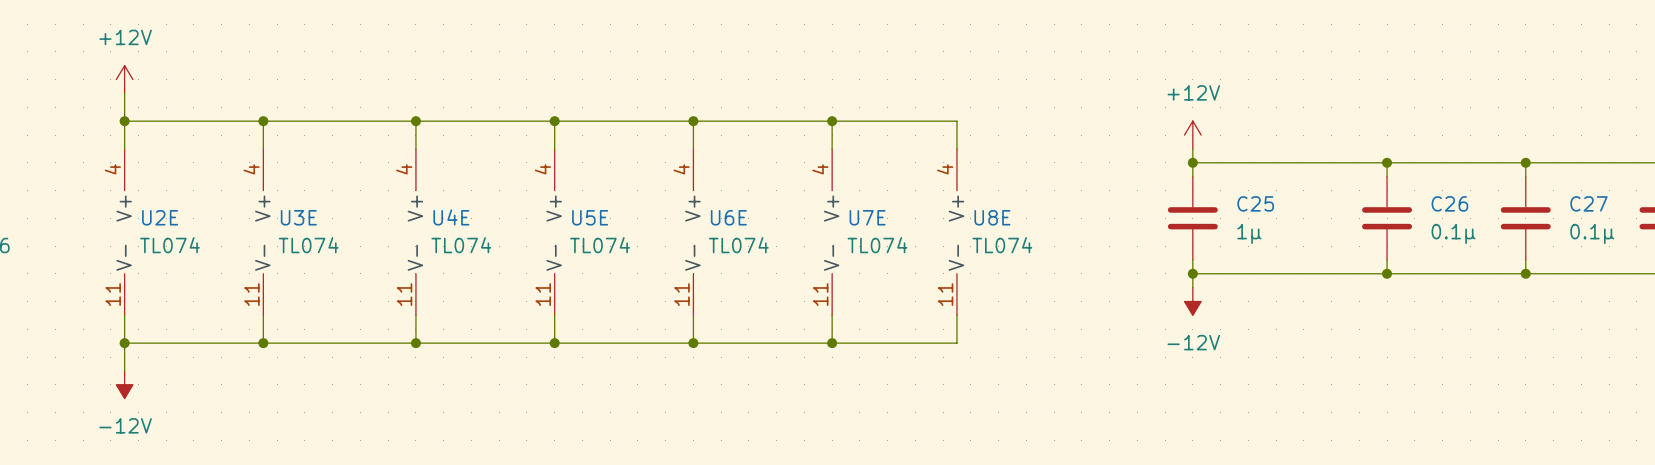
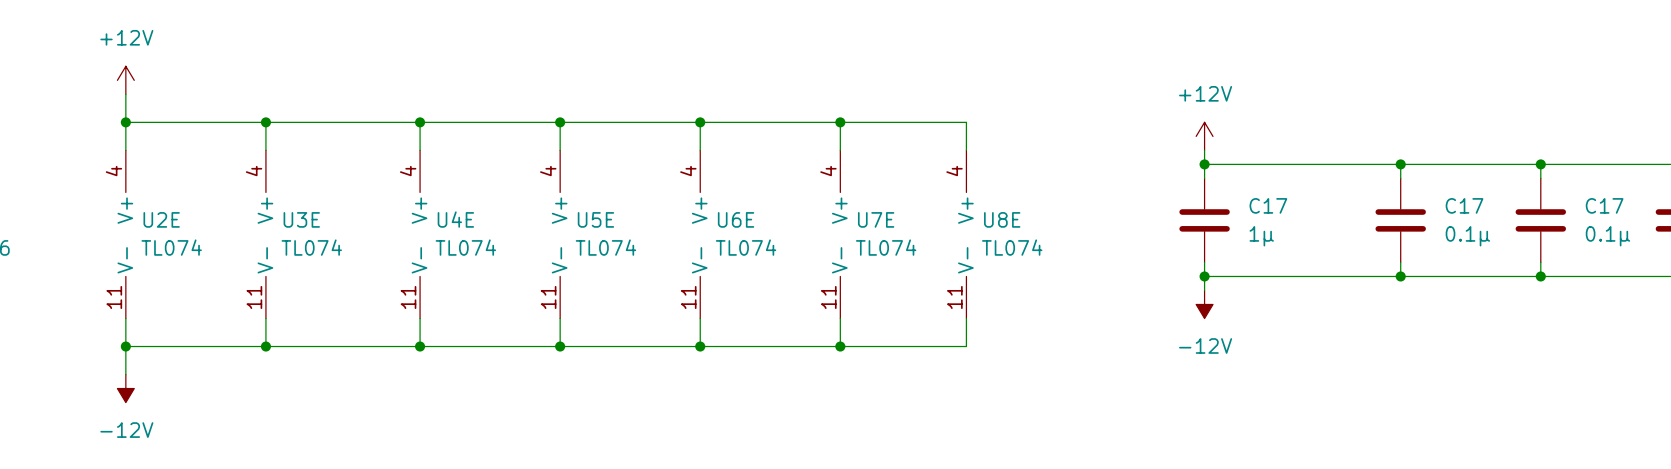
C25 name: C25 (1255, 203) -> C17 (1268, 205)
C26 name: C26 (1449, 203) -> C17 (1464, 205)
C27 name: C27 (1588, 203) -> C17 (1604, 205)

